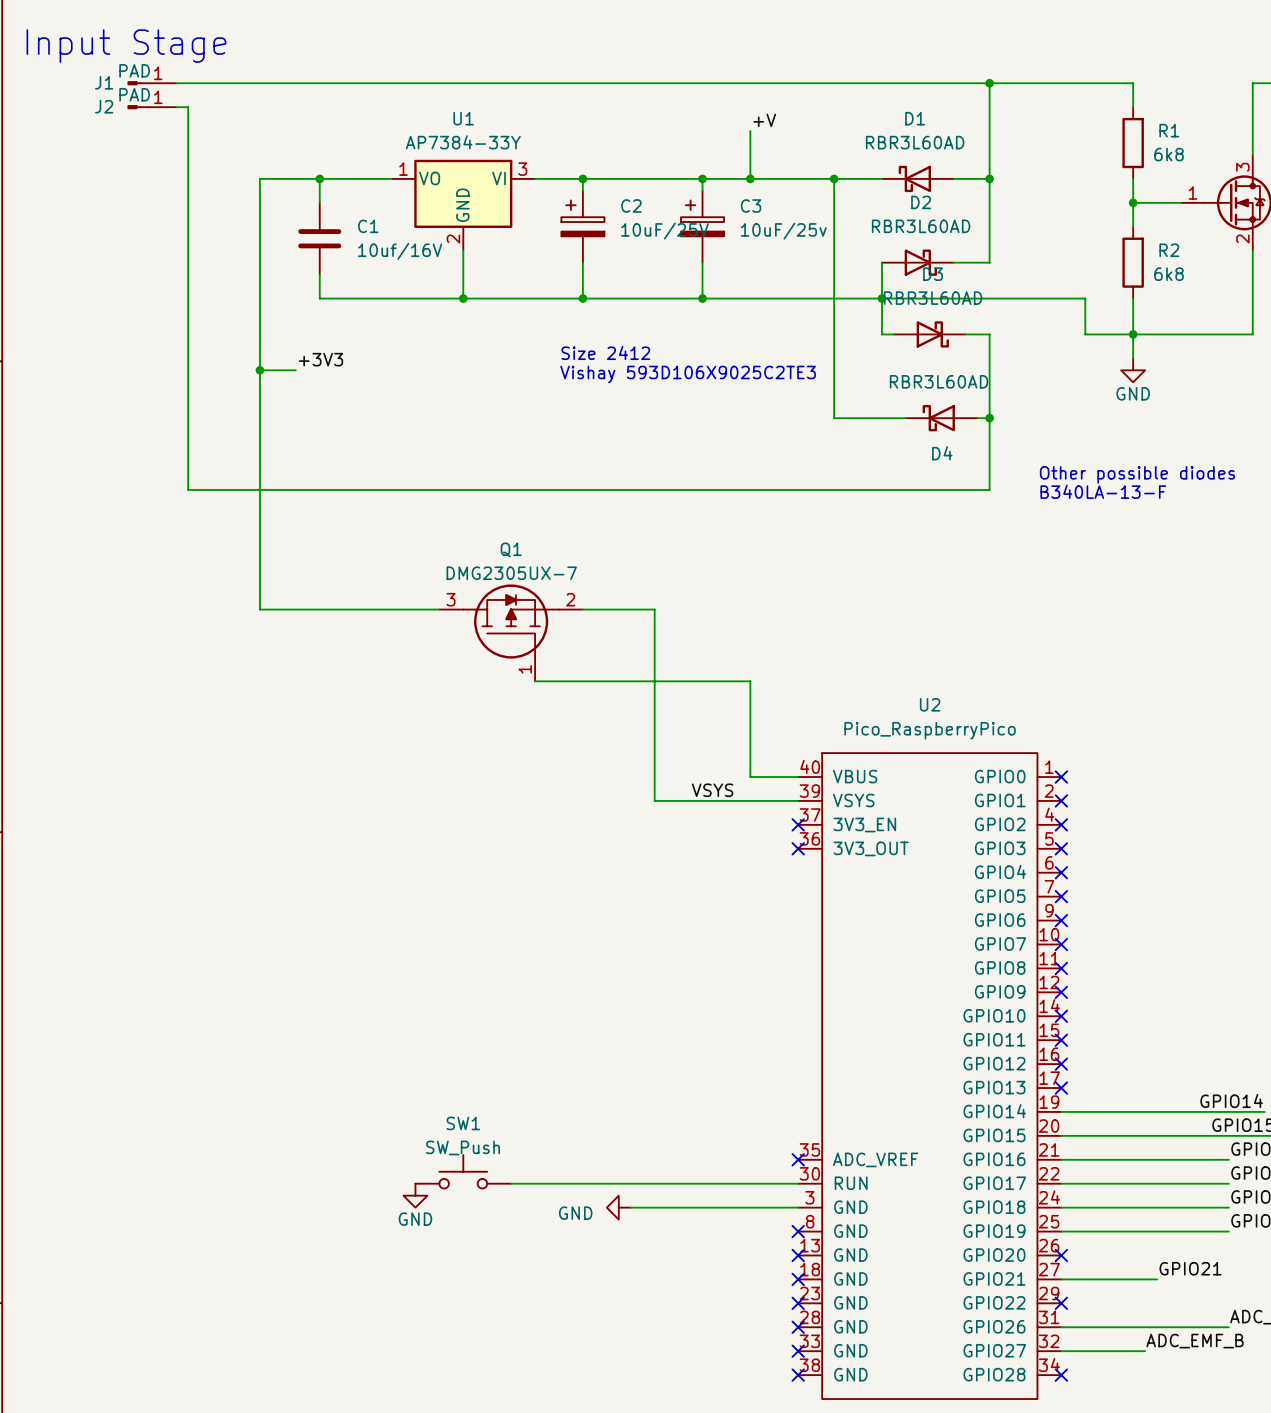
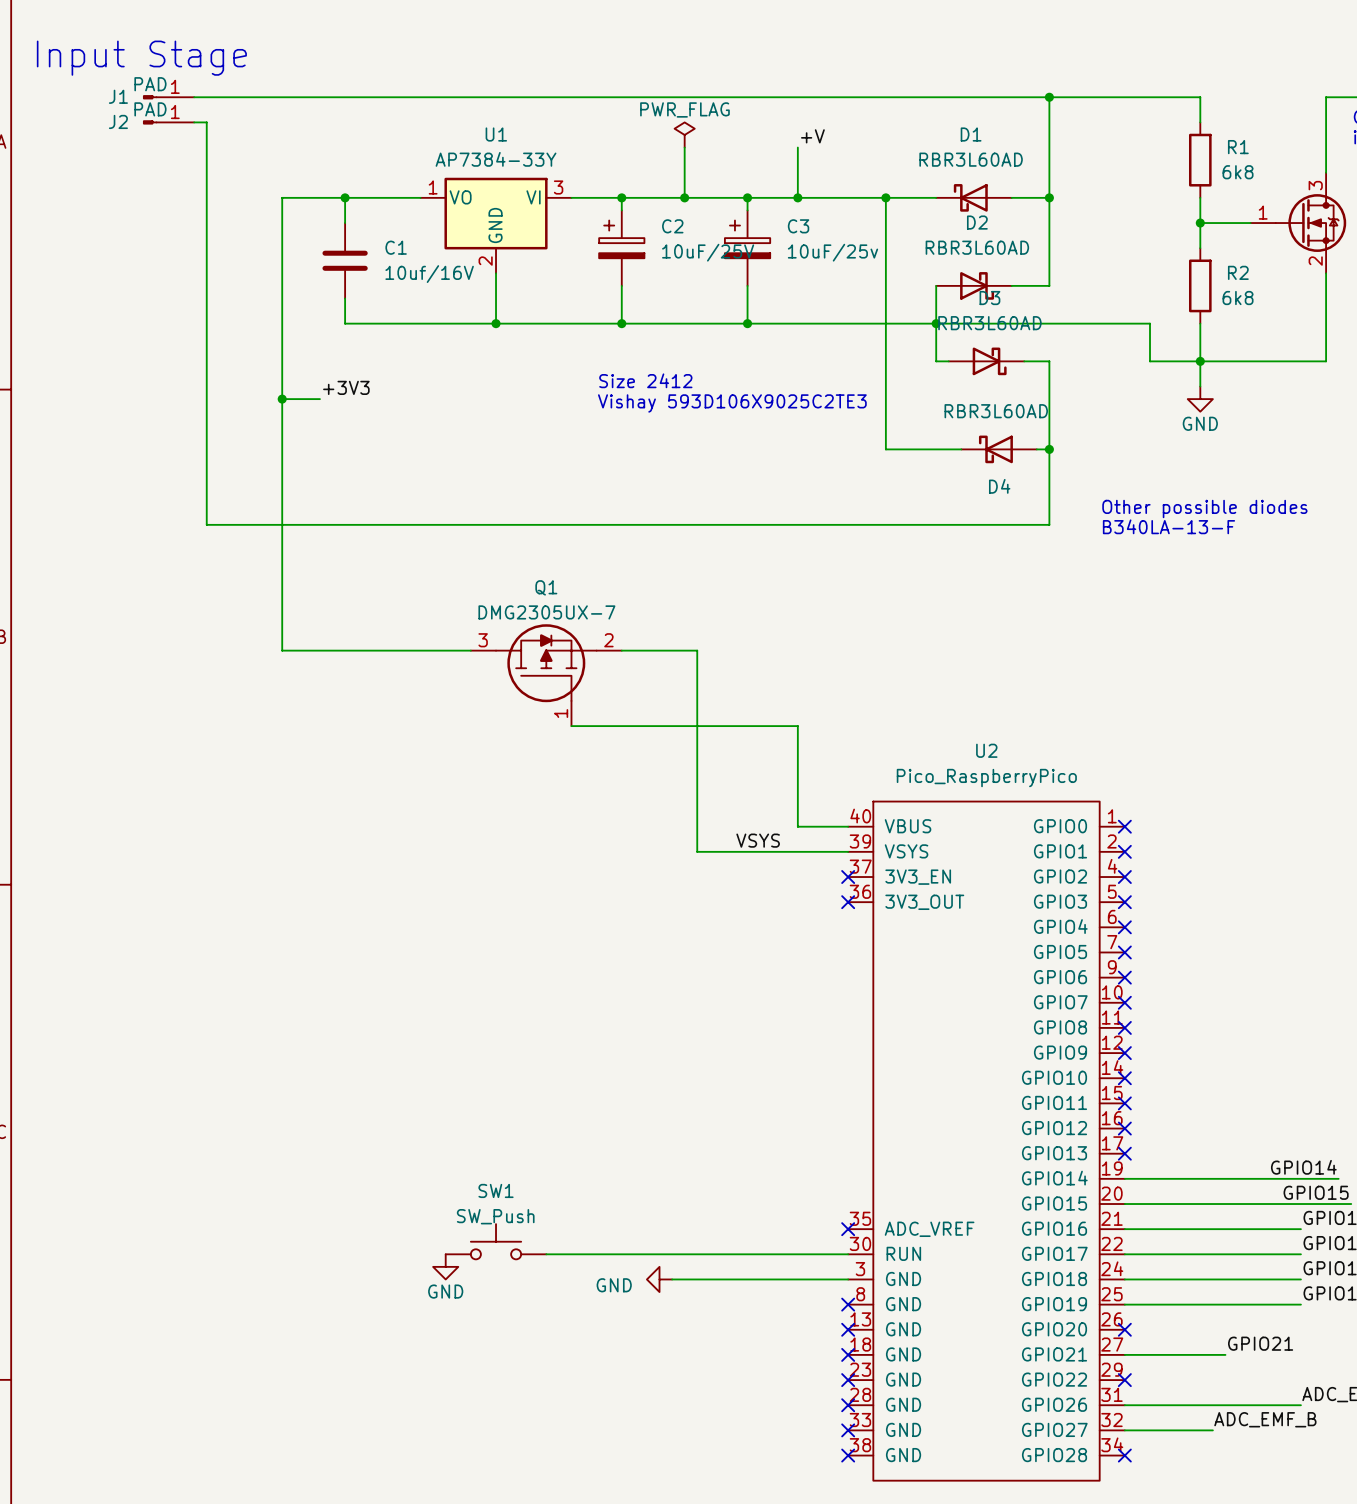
power symbol: none -> PWR_FLAG (684, 134)
wire: none -> (684, 147) (684, 197)
junction: none -> (684, 197)

